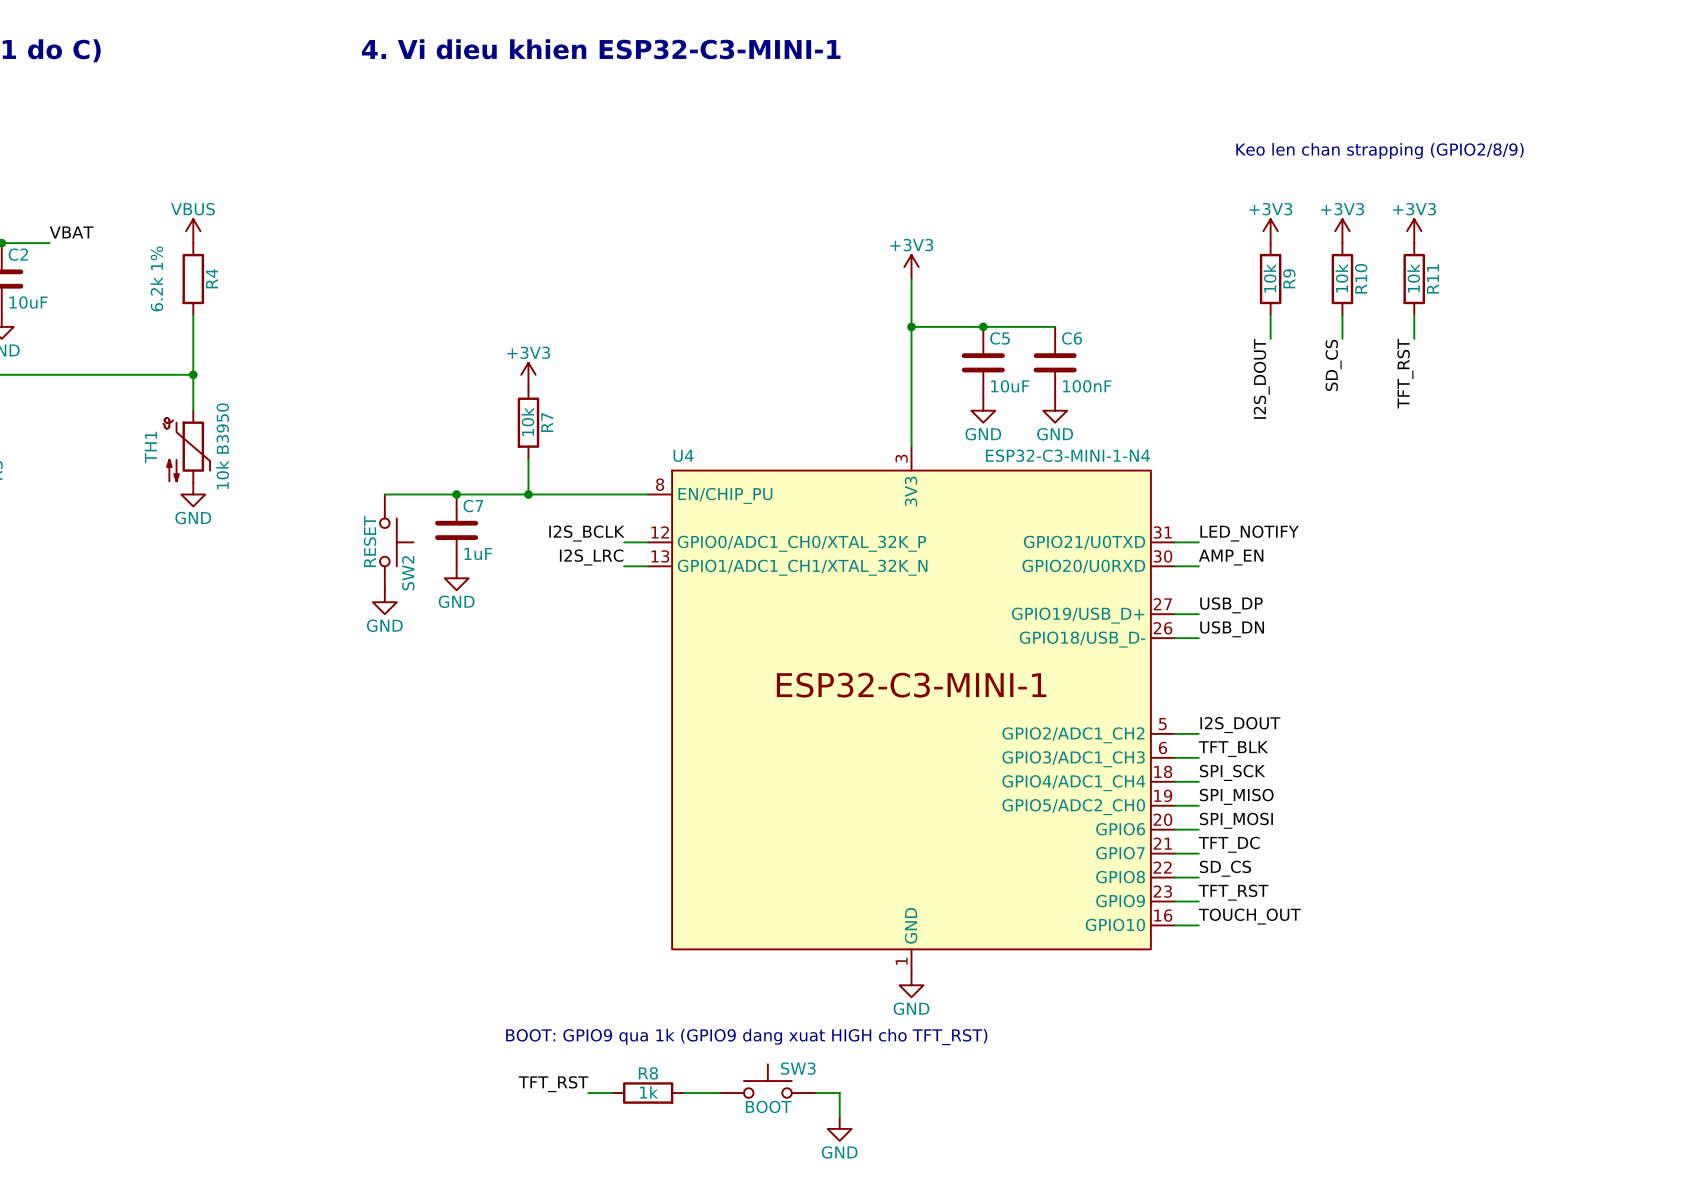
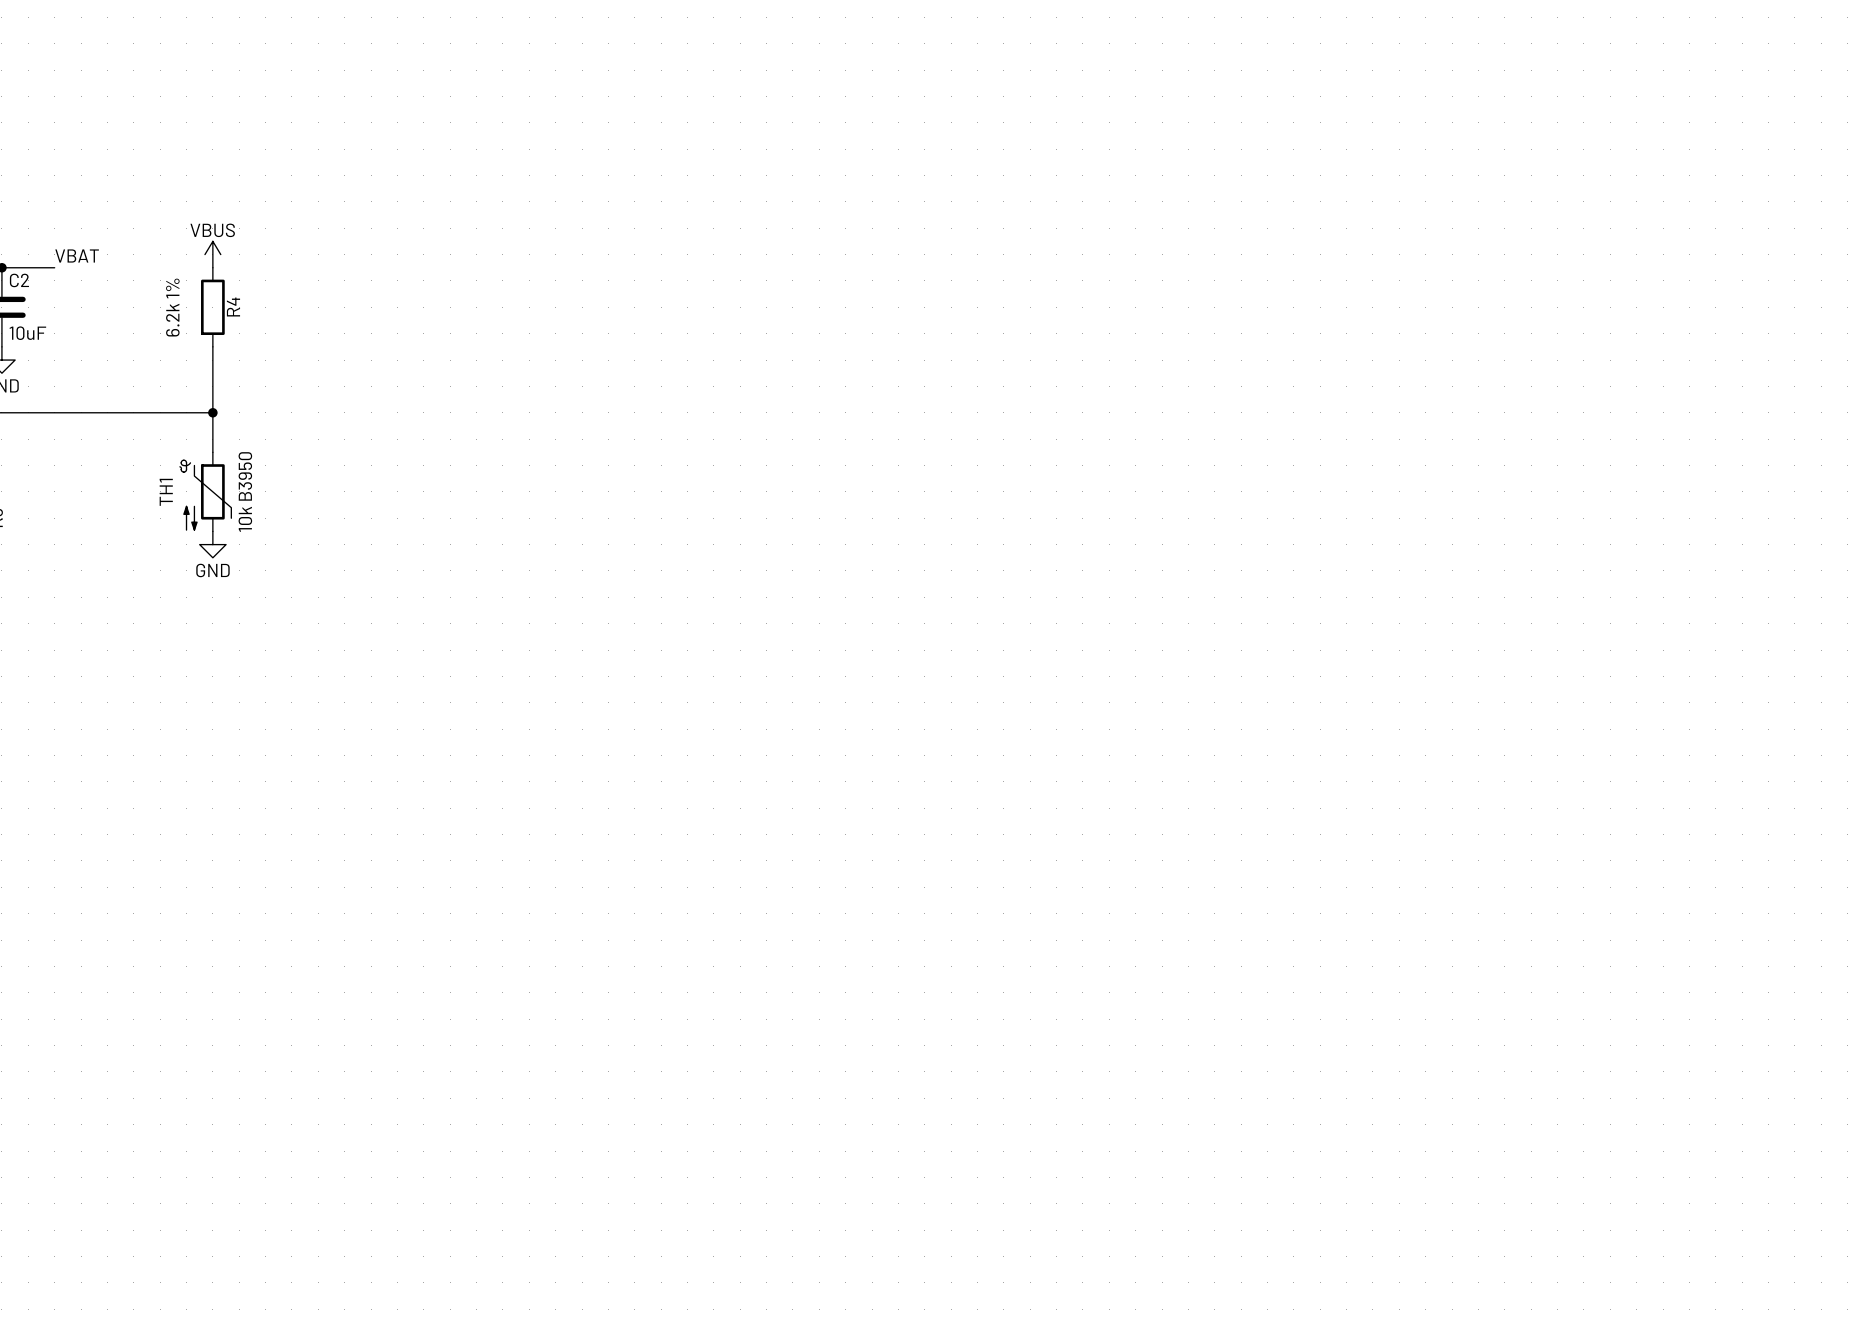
text: 4. Vi dieu khien ESP32-C3-MINI-1 (601, 49) -> none
text: Keo len chan strapping (GPIO2/8/9) (1380, 150) -> none
power symbol: +3V3 (1270, 231) -> none
power symbol: +3V3 (1342, 231) -> none
power symbol: +3V3 (1414, 231) -> none
power symbol: +3V3 (911, 267) -> none
wire: (911, 279) (911, 446) -> none
R9: 10k (1270, 279) -> none
R10: 10k (1342, 279) -> none
R11: 10k (1414, 279) -> none
wire: (1270, 314) (1270, 338) -> none
wire: (1342, 314) (1342, 338) -> none
wire: (1414, 314) (1414, 338) -> none
wire: (911, 326) (1055, 326) -> none
junction: (911, 326) -> none
junction: (983, 326) -> none
C5: 10uF (983, 362) -> none
C6: 100nF (1055, 362) -> none
label: SD_CS (1333, 365) -> none
label: TFT_RST (1405, 373) -> none
power symbol: +3V3 (528, 374) -> none
label: I2S_DOUT (1261, 378) -> none
power symbol: GND (983, 410) -> none
power symbol: GND (1055, 410) -> none
R7: 10k (528, 422) -> none
wire: (528, 458) (528, 494) -> none
wire: (384, 494) (648, 494) -> none
junction: (456, 494) -> none
junction: (528, 494) -> none
C7: 1uF (456, 530) -> none
label: I2S_BCLK (586, 533) -> none
label: LED_NOTIFY (1249, 533) -> none
SW2: RESET (396, 542) -> none
wire: (624, 542) (648, 542) -> none
wire: (1174, 542) (1198, 542) -> none
label: I2S_LRC (591, 557) -> none
label: AMP_EN (1231, 557) -> none
wire: (624, 566) (648, 566) -> none
wire: (1174, 566) (1198, 566) -> none
power symbol: GND (456, 578) -> none
power symbol: GND (384, 602) -> none
label: USB_DP (1231, 605) -> none
wire: (1174, 614) (1198, 614) -> none
label: USB_DN (1232, 629) -> none
wire: (1174, 638) (1198, 638) -> none
U4: ESP32-C3-MINI-1-N4 (911, 709) -> none
label: I2S_DOUT (1240, 725) -> none
wire: (1174, 733) (1198, 733) -> none
label: TFT_BLK (1233, 749) -> none
wire: (1174, 757) (1198, 757) -> none
label: SPI_SCK (1232, 772) -> none
wire: (1174, 781) (1198, 781) -> none
label: SPI_MISO (1236, 796) -> none
wire: (1174, 805) (1198, 805) -> none
label: SPI_MOSI (1236, 820) -> none
wire: (1174, 829) (1198, 829) -> none
label: TFT_DC (1229, 844) -> none
wire: (1174, 853) (1198, 853) -> none
label: SD_CS (1225, 868) -> none
wire: (1174, 877) (1198, 877) -> none
label: TFT_RST (1233, 892) -> none
wire: (1174, 901) (1198, 901) -> none
label: TOUCH_OUT (1249, 916) -> none
wire: (1174, 925) (1198, 925) -> none
power symbol: GND (911, 985) -> none
text: BOOT: GPIO9 qua 1k (GPIO9 dang xuat HIGH cho TFT_RST) (746, 1037) -> none
SW3: BOOT (767, 1081) -> none
label: TFT_RST (553, 1084) -> none
wire: (588, 1093) (612, 1093) -> none
R8: 1k (648, 1093) -> none
wire: (684, 1093) (719, 1093) -> none
wire: (815, 1093) (839, 1093) (839, 1116) -> none
power symbol: GND (839, 1128) -> none

